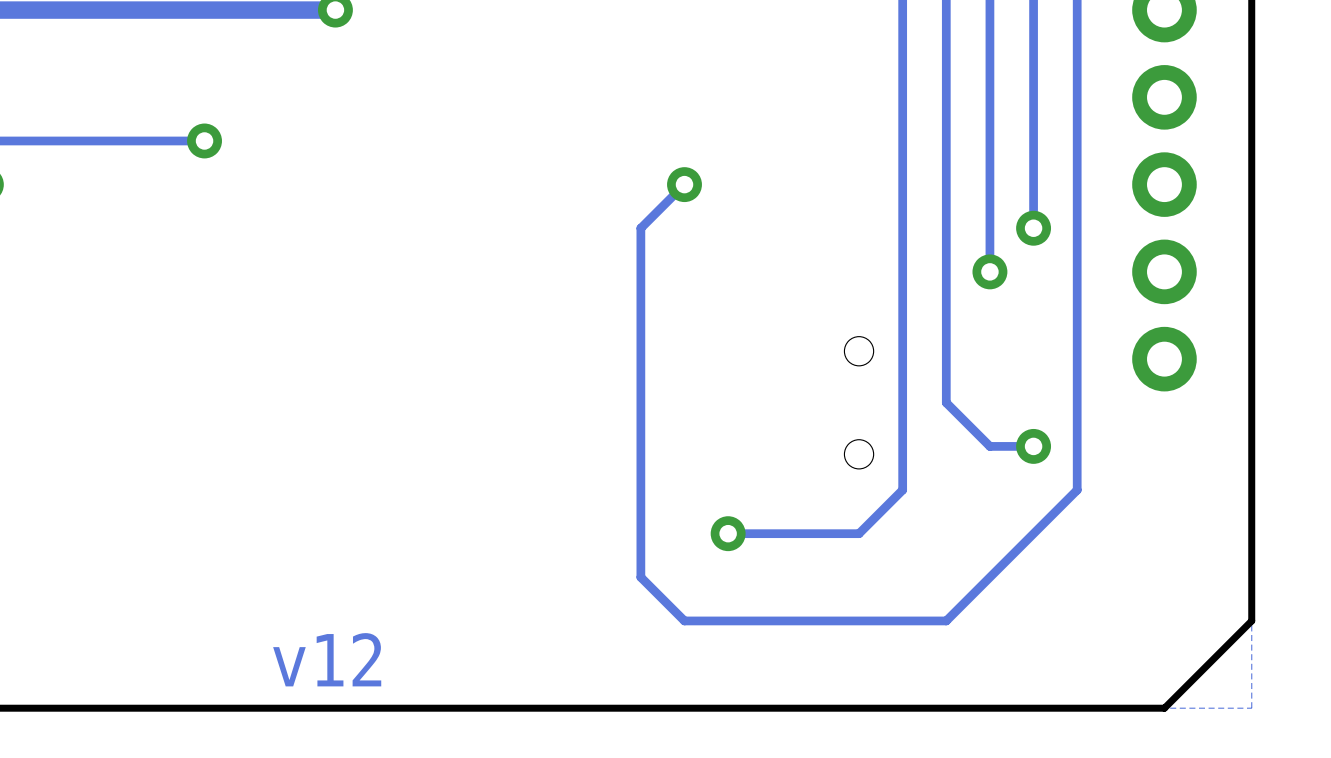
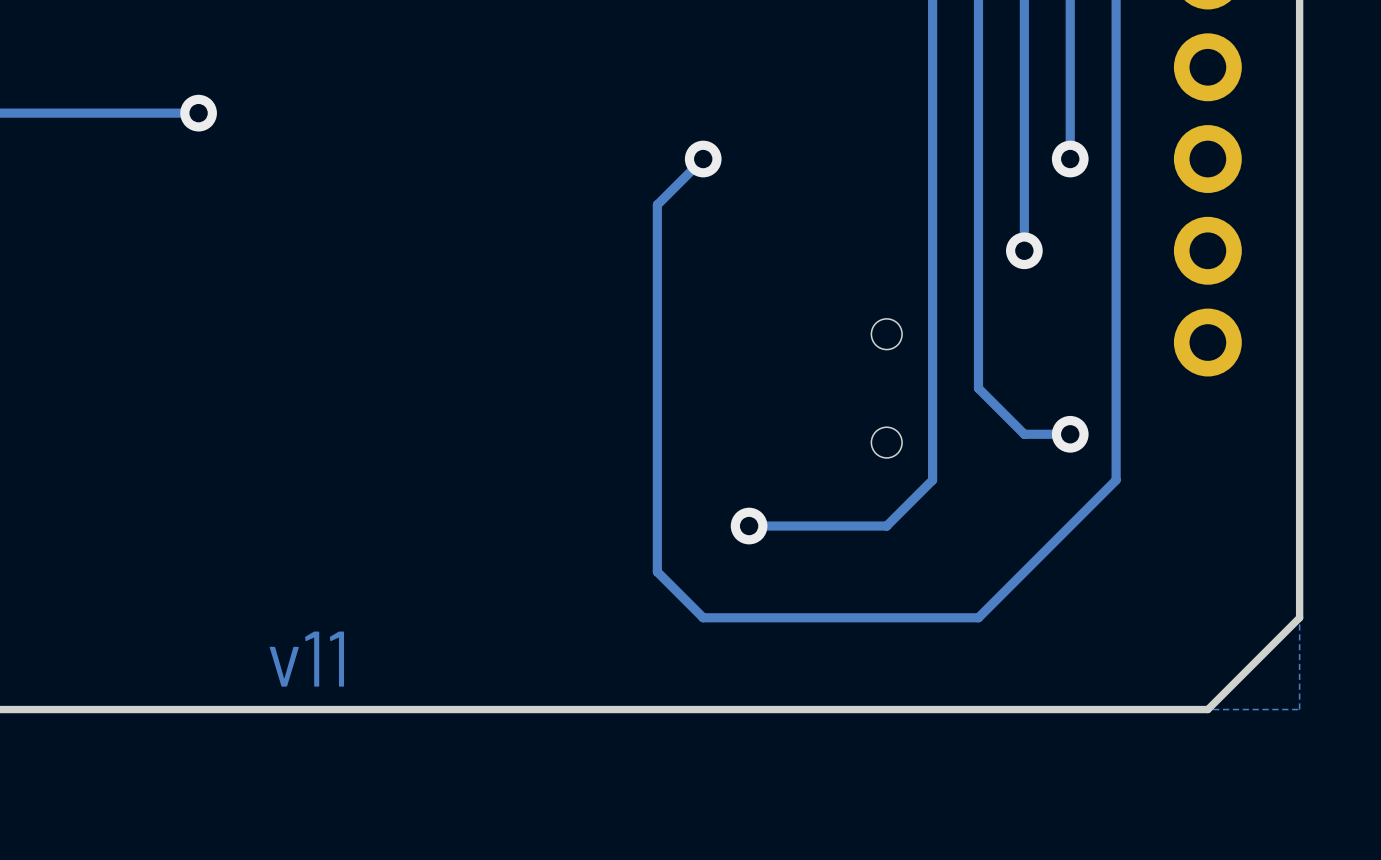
track: (1033, 184) (1033, 228) -> none
via position: (1033, 228) -> (1070, 159)
text: v12 (327, 659) -> v11 (306, 659)

